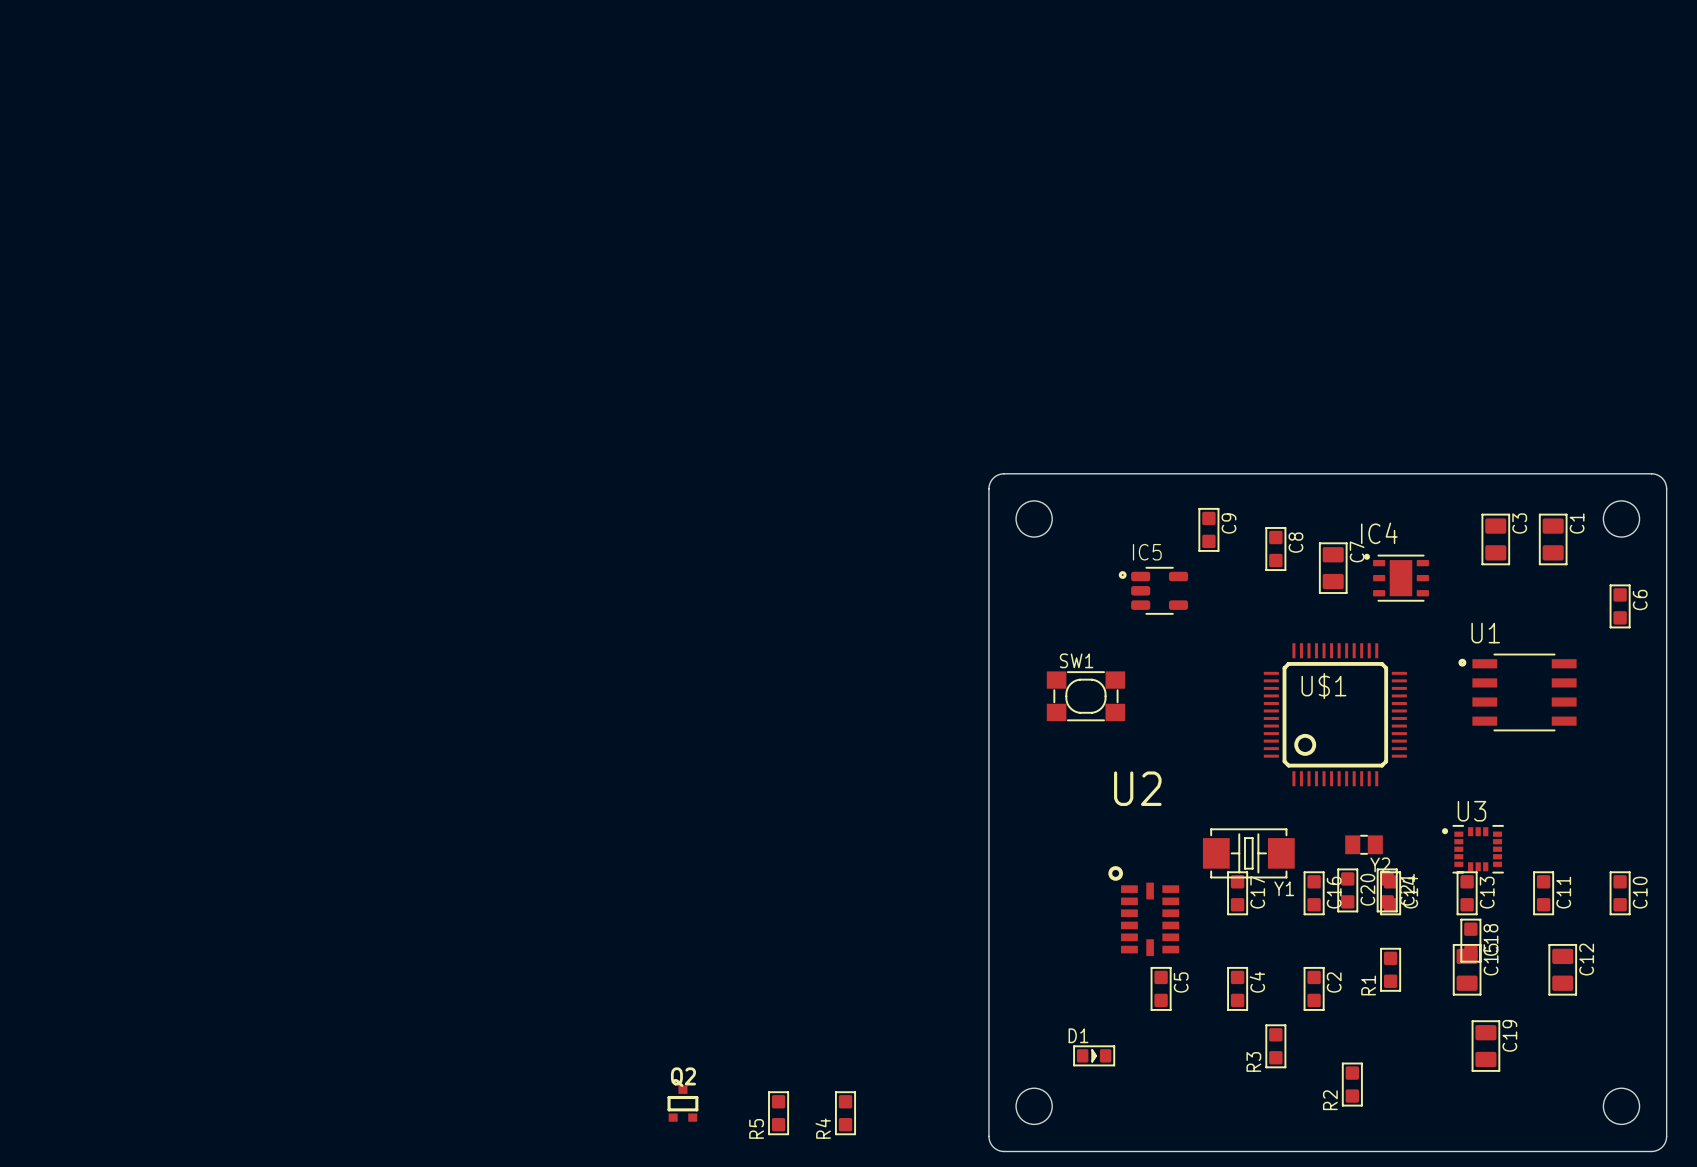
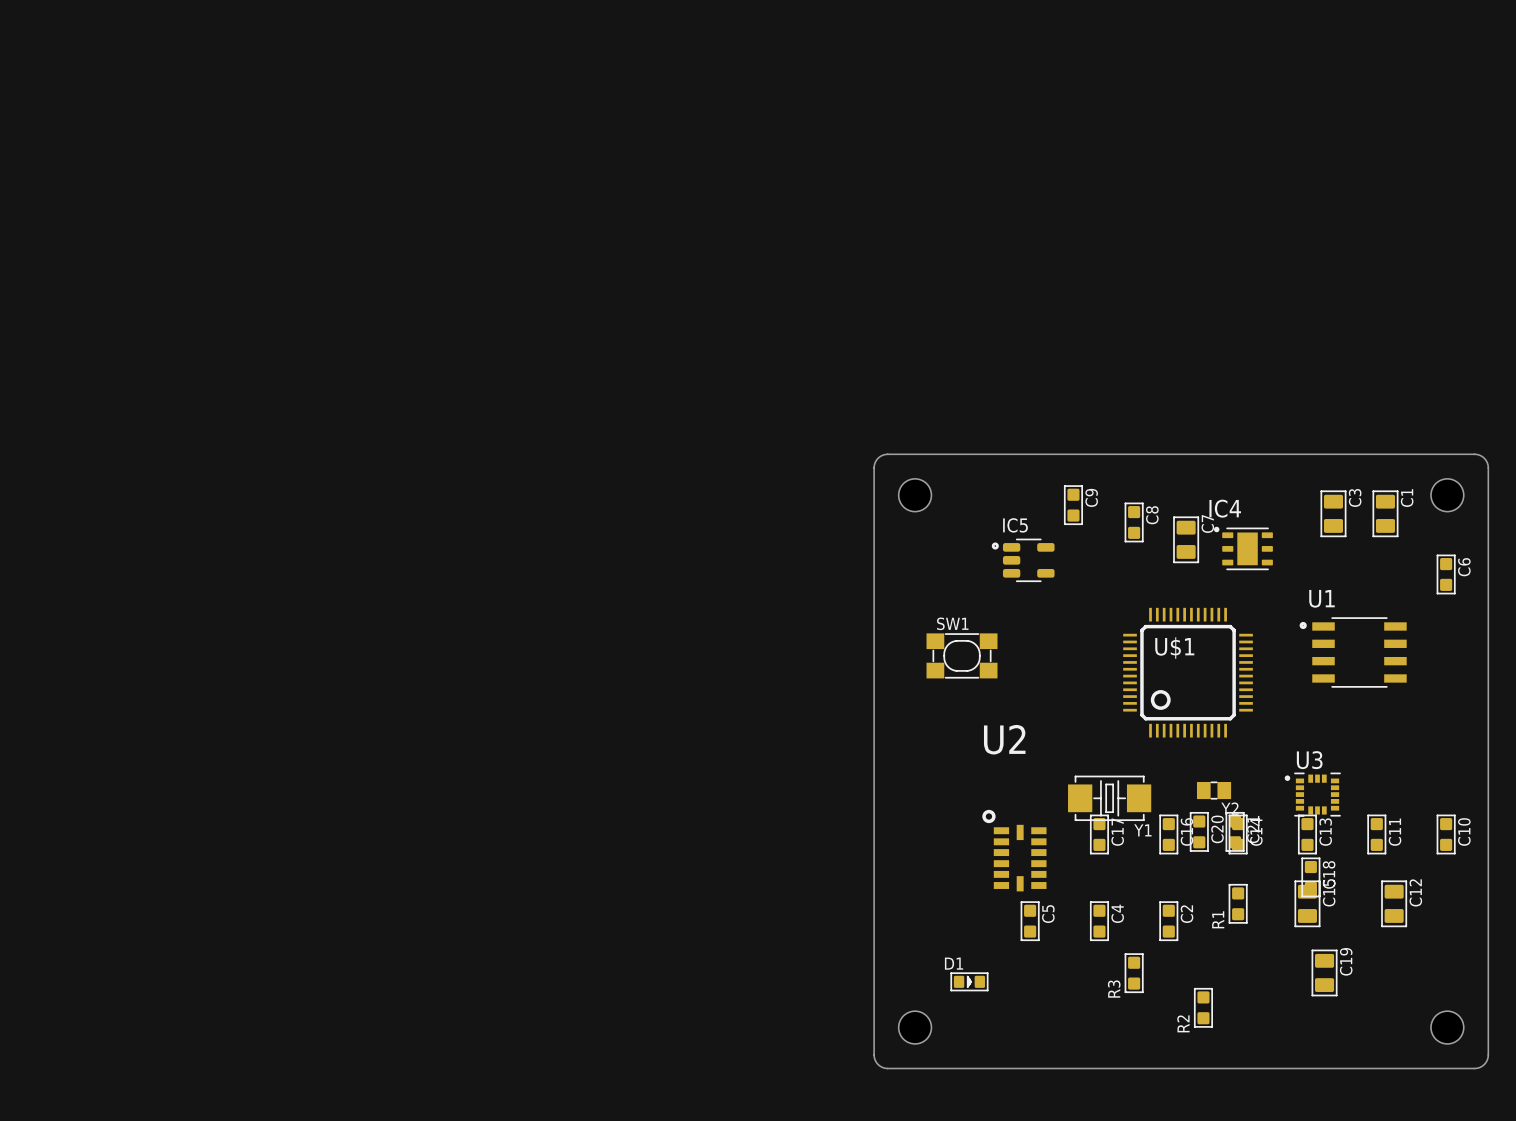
Q2: (682, 1103) -> none
R5: (778, 1113) -> none
R4: (845, 1113) -> none

